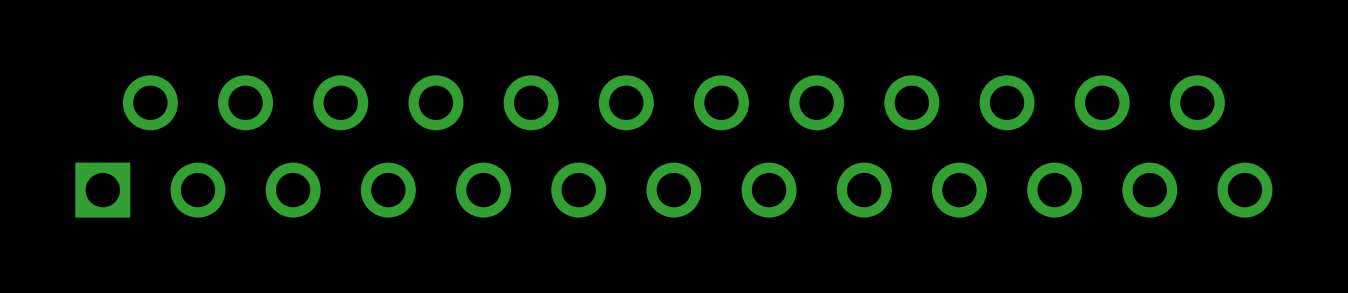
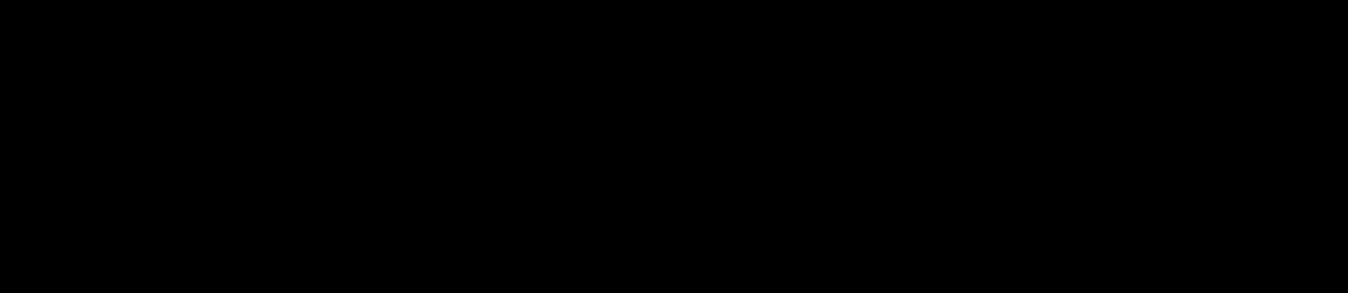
part: (673, 146) -> none

